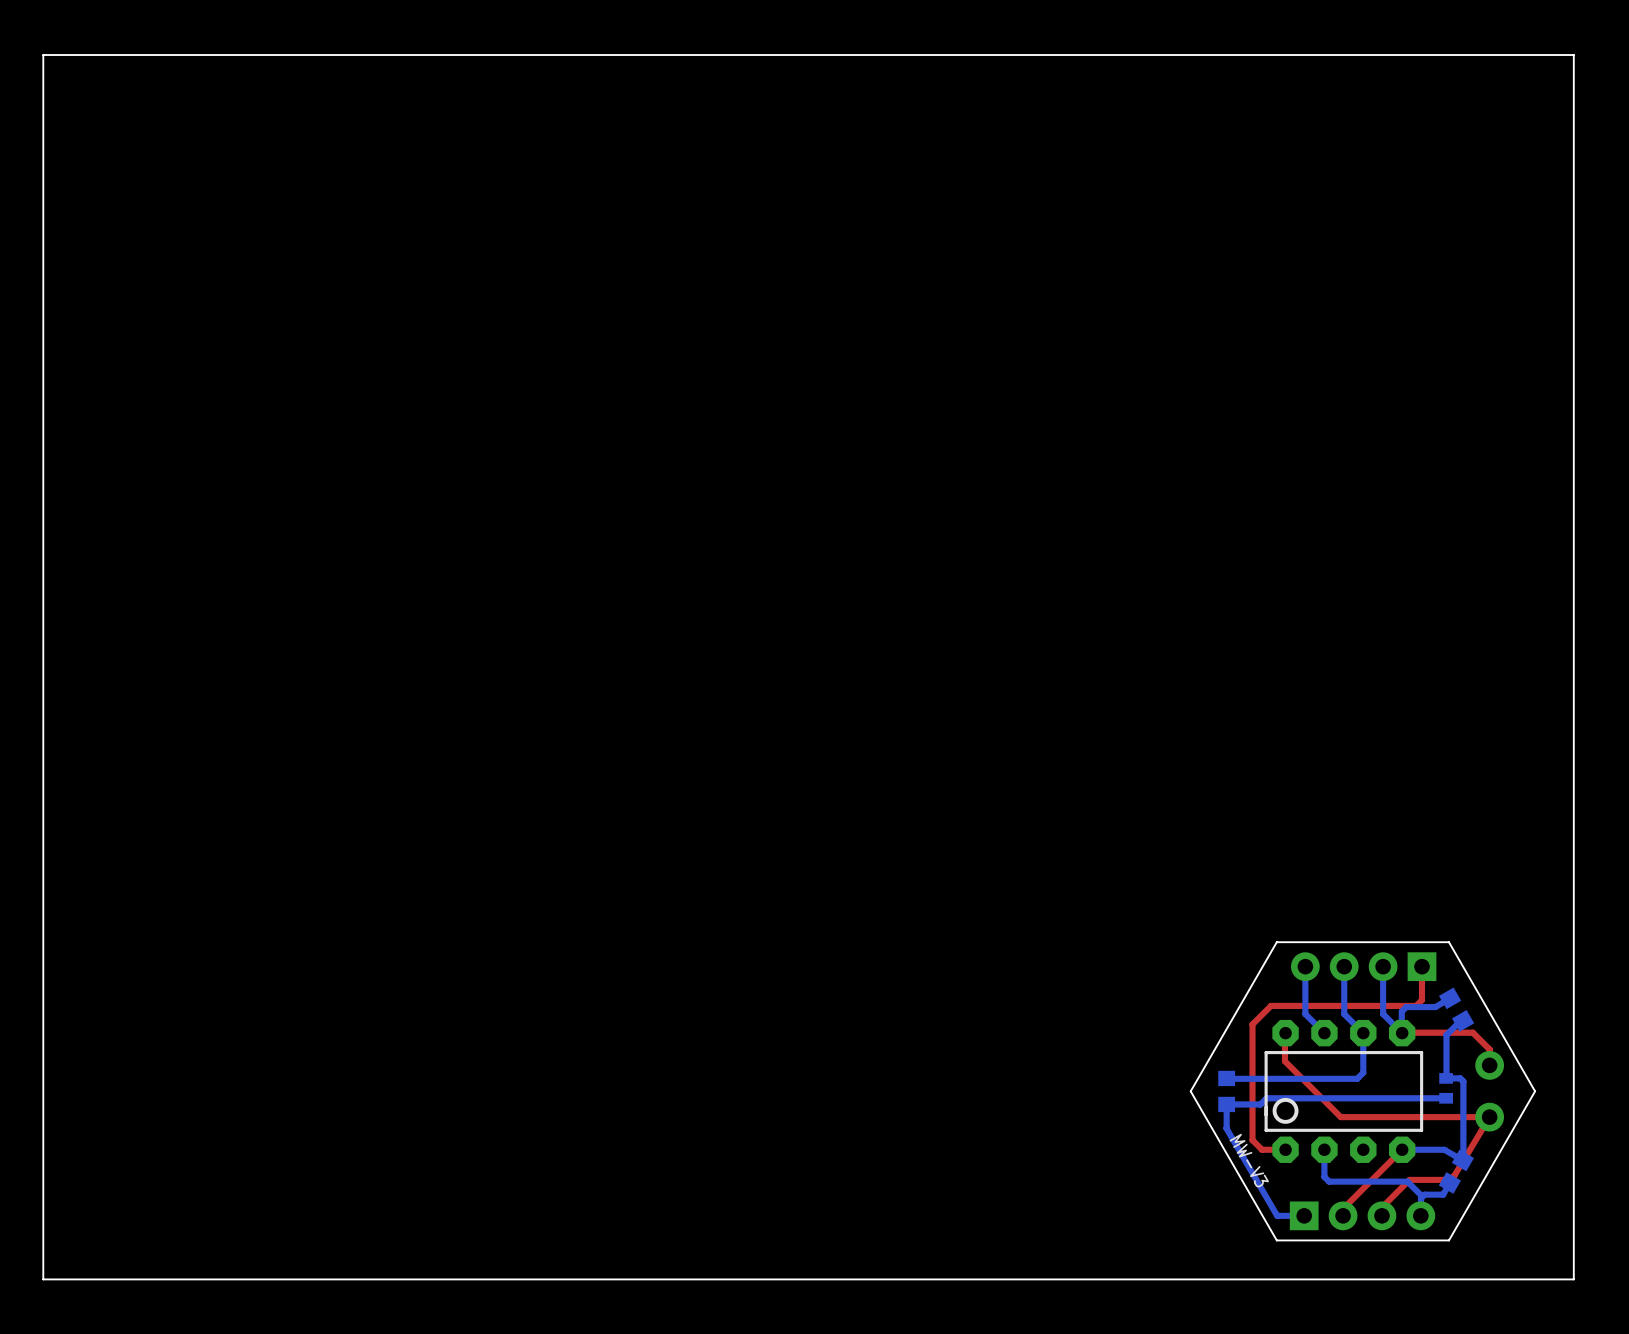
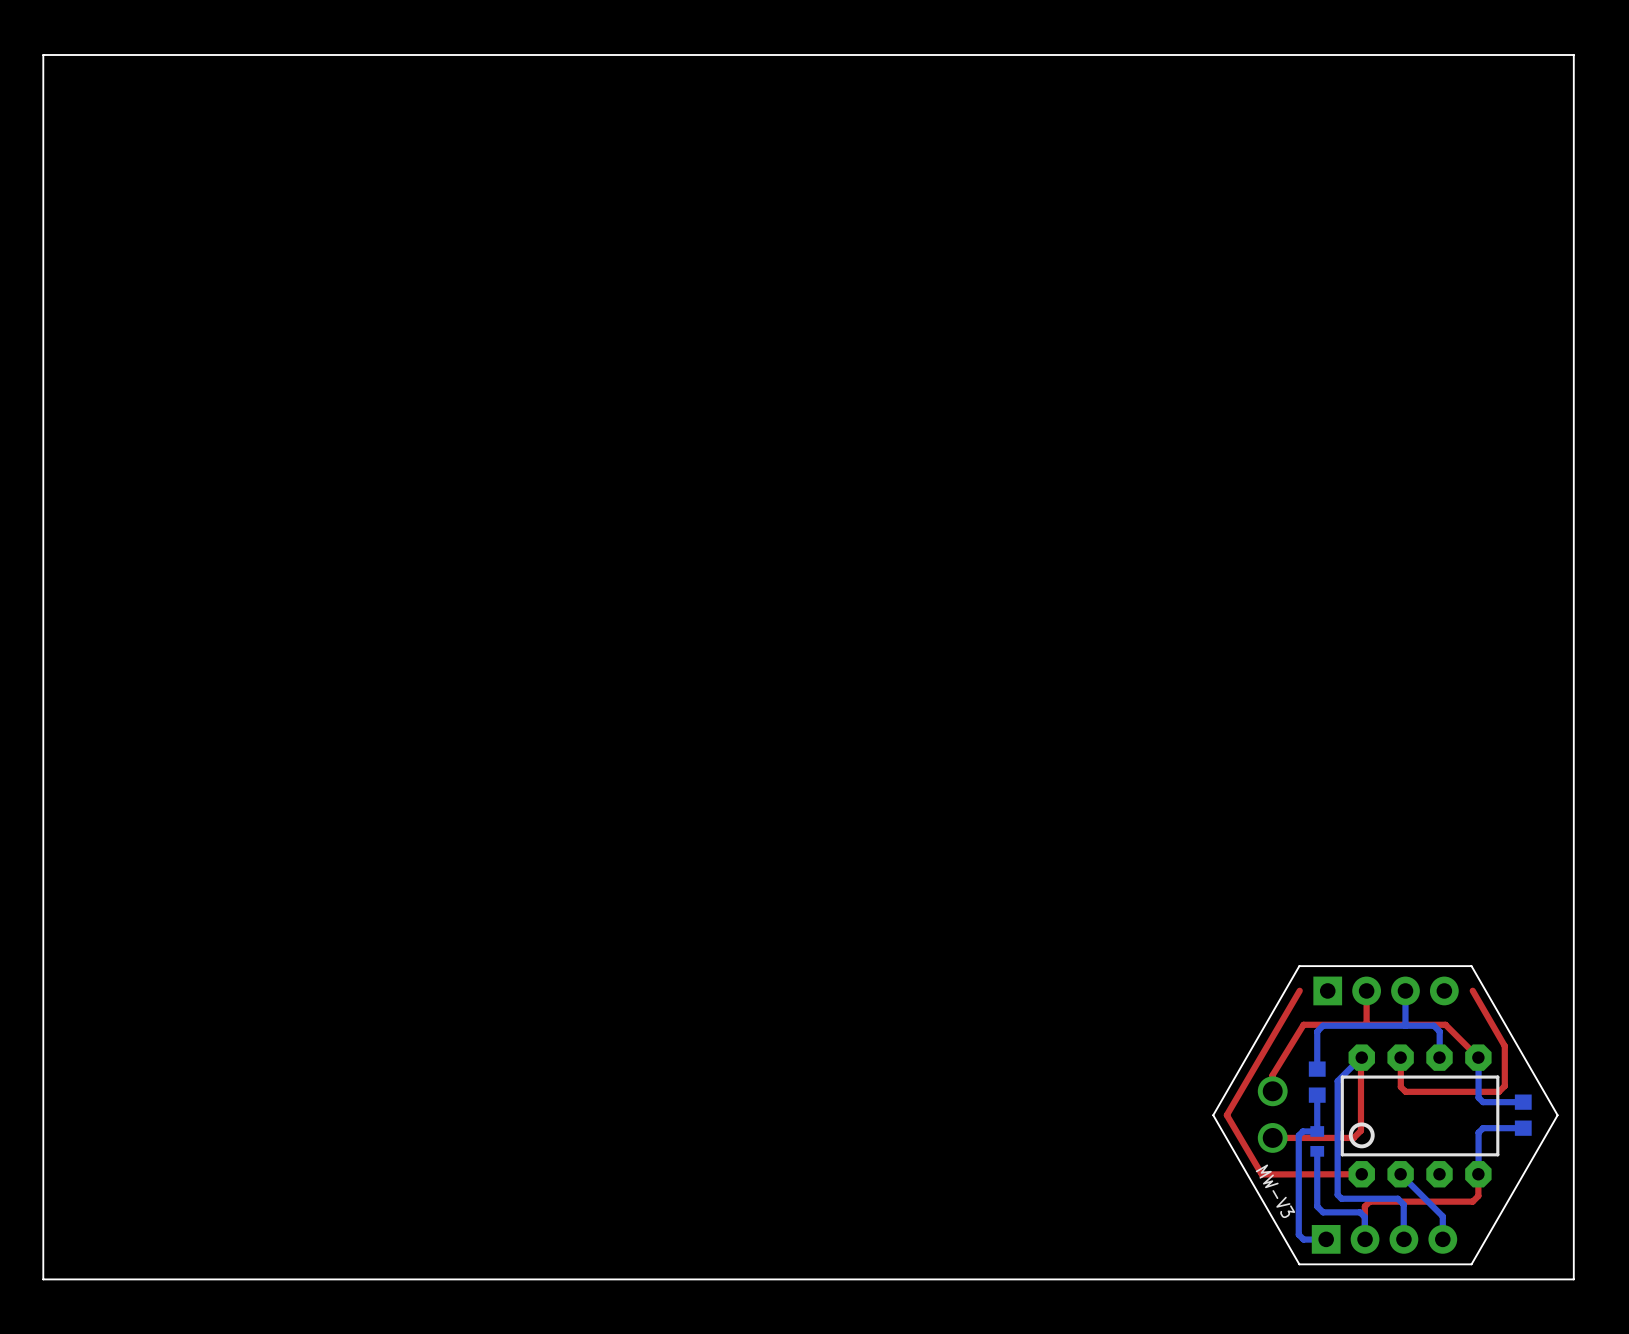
board edge: (1448, 942) (1276, 942) (1190, 1091) (1276, 1240) (1448, 1240) (1535, 1091) (1448, 942) -> (1471, 966) (1299, 966) (1213, 1115) (1299, 1264) (1471, 1264) (1557, 1115) (1471, 966)
bottom track: (1305, 966) (1305, 1014) (1324, 1033) -> none
bottom track: (1344, 966) (1344, 1014) (1363, 1033) (1363, 1072) (1357, 1078) (1226, 1078) -> none
part rotation: 0° (1363, 966) -> 180° (1386, 990)
bottom track: (1383, 966) (1383, 1014) (1402, 1033) -> none
top track: (1422, 966) (1422, 1000) (1416, 1005) (1270, 1005) (1252, 1024) (1252, 1140) (1262, 1149) (1285, 1149) -> none
top track: none -> (1299, 990) (1226, 1115) (1261, 1174) (1361, 1174)
top track: none -> (1366, 990) (1366, 1024)
bottom track: none -> (1405, 990) (1405, 1025)
top track: none -> (1472, 990) (1504, 1046) (1504, 1086) (1498, 1091) (1405, 1091) (1400, 1086) (1400, 1057)
bottom track: (1450, 998) (1435, 1007) (1406, 1007) (1401, 1011) (1401, 1032) -> none
part: (1456, 1009) -> none
bottom track: (1463, 1020) (1460, 1020) (1446, 1035) (1446, 1078) (1460, 1078) (1463, 1081) (1463, 1159) (1444, 1149) (1402, 1149) -> none
top track: (1285, 1033) (1284, 1061) (1340, 1117) (1489, 1117) (1449, 1180) (1409, 1179) (1381, 1207) (1381, 1215) -> none
top track: (1402, 1033) (1472, 1032) (1489, 1049) (1489, 1065) -> none
bottom track: none -> (1361, 1057) (1337, 1081) (1337, 1194) (1341, 1198) (1397, 1198) (1403, 1204) (1403, 1239)
top track: none -> (1361, 1057) (1360, 1130) (1353, 1137) (1272, 1137)
bottom track: none -> (1439, 1057) (1439, 1031) (1433, 1025) (1323, 1025) (1317, 1031) (1317, 1069)
bottom track: none -> (1478, 1057) (1478, 1097) (1483, 1102) (1523, 1102)
top track: none -> (1478, 1057) (1445, 1024) (1303, 1024) (1272, 1075) (1272, 1091)
part position: (1446, 1088) -> (1317, 1141)
part position: (1226, 1091) -> (1317, 1082)
part position: (1343, 1091) -> (1420, 1115)
part: (1489, 1091) -> none
bottom track: none -> (1317, 1095) (1317, 1131) (1302, 1131) (1298, 1135) (1298, 1234) (1303, 1239) (1325, 1239)
bottom track: (1446, 1098) (1266, 1098) (1260, 1104) (1226, 1104) (1226, 1128) -> none
part: none -> (1272, 1114)
part: none -> (1523, 1115)
bottom track: (1226, 1128) (1277, 1215) (1304, 1215) -> none
bottom track: none -> (1523, 1128) (1483, 1128) (1478, 1132) (1478, 1174)
bottom track: (1324, 1149) (1324, 1176) (1329, 1181) (1407, 1181) (1422, 1196) -> none
top track: (1402, 1149) (1343, 1208) (1343, 1215) -> none
bottom track: none -> (1317, 1151) (1317, 1206) (1323, 1212) (1360, 1212) (1364, 1217) (1364, 1239)
text position: MW-V3 (1249, 1160) -> MW-V3 (1275, 1191)
part: (1456, 1171) -> none
bottom track: none -> (1400, 1174) (1442, 1216) (1442, 1239)
top track: none -> (1478, 1174) (1478, 1196) (1472, 1201) (1369, 1201) (1364, 1206) (1364, 1239)
bottom track: (1449, 1182) (1443, 1194) (1424, 1194) (1421, 1198) (1421, 1215) -> none
part position: (1362, 1215) -> (1384, 1239)

